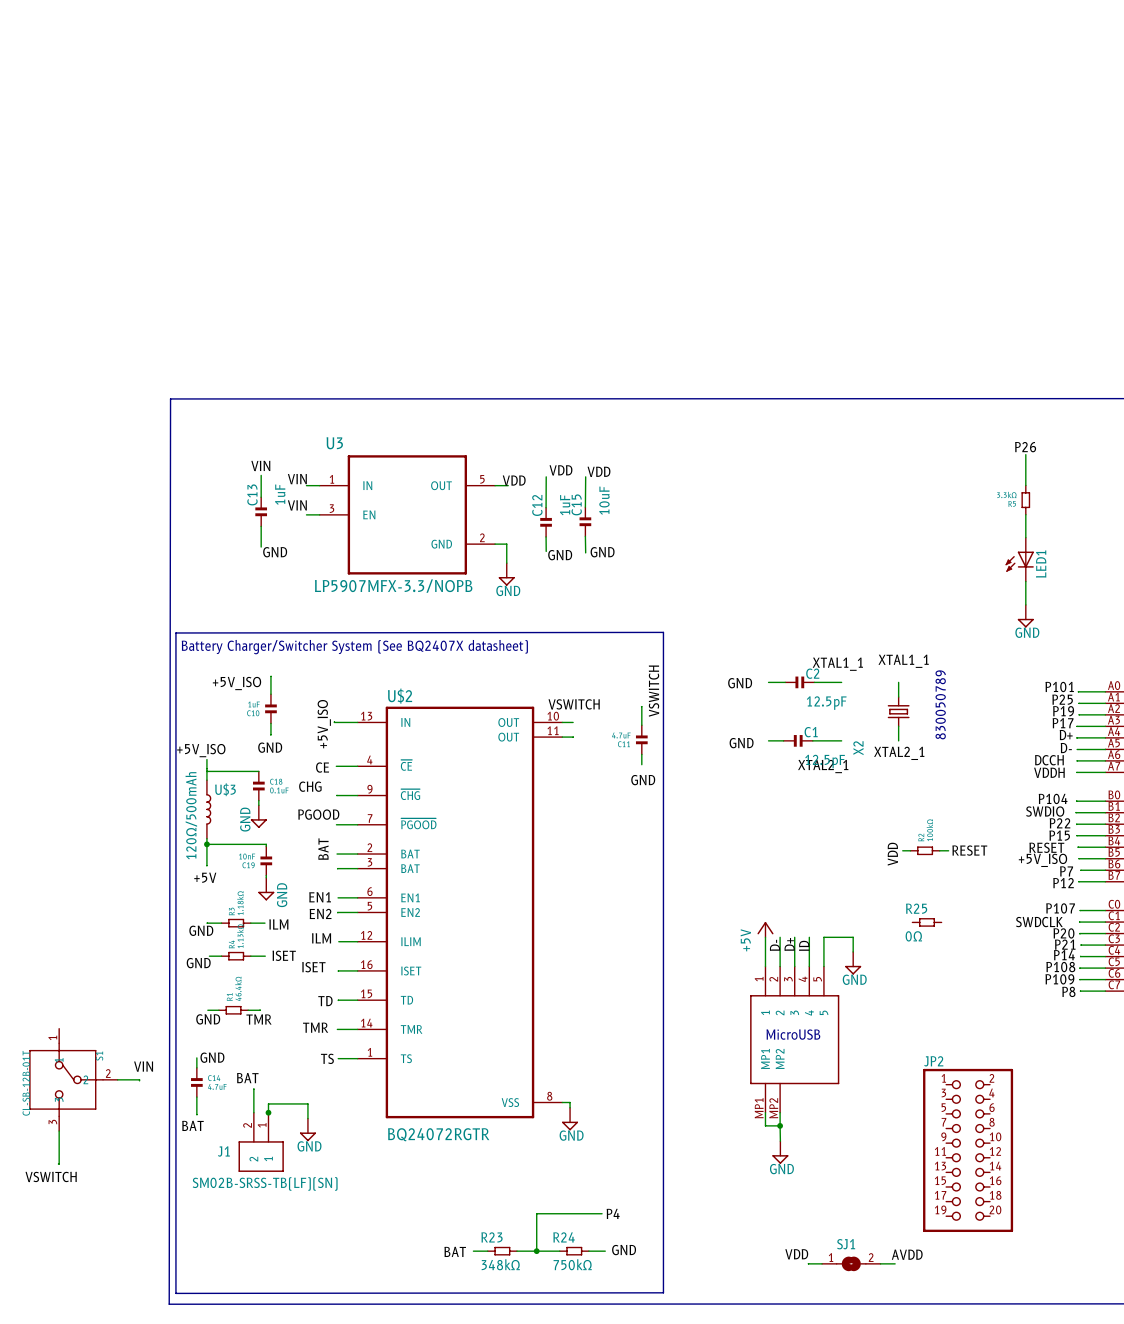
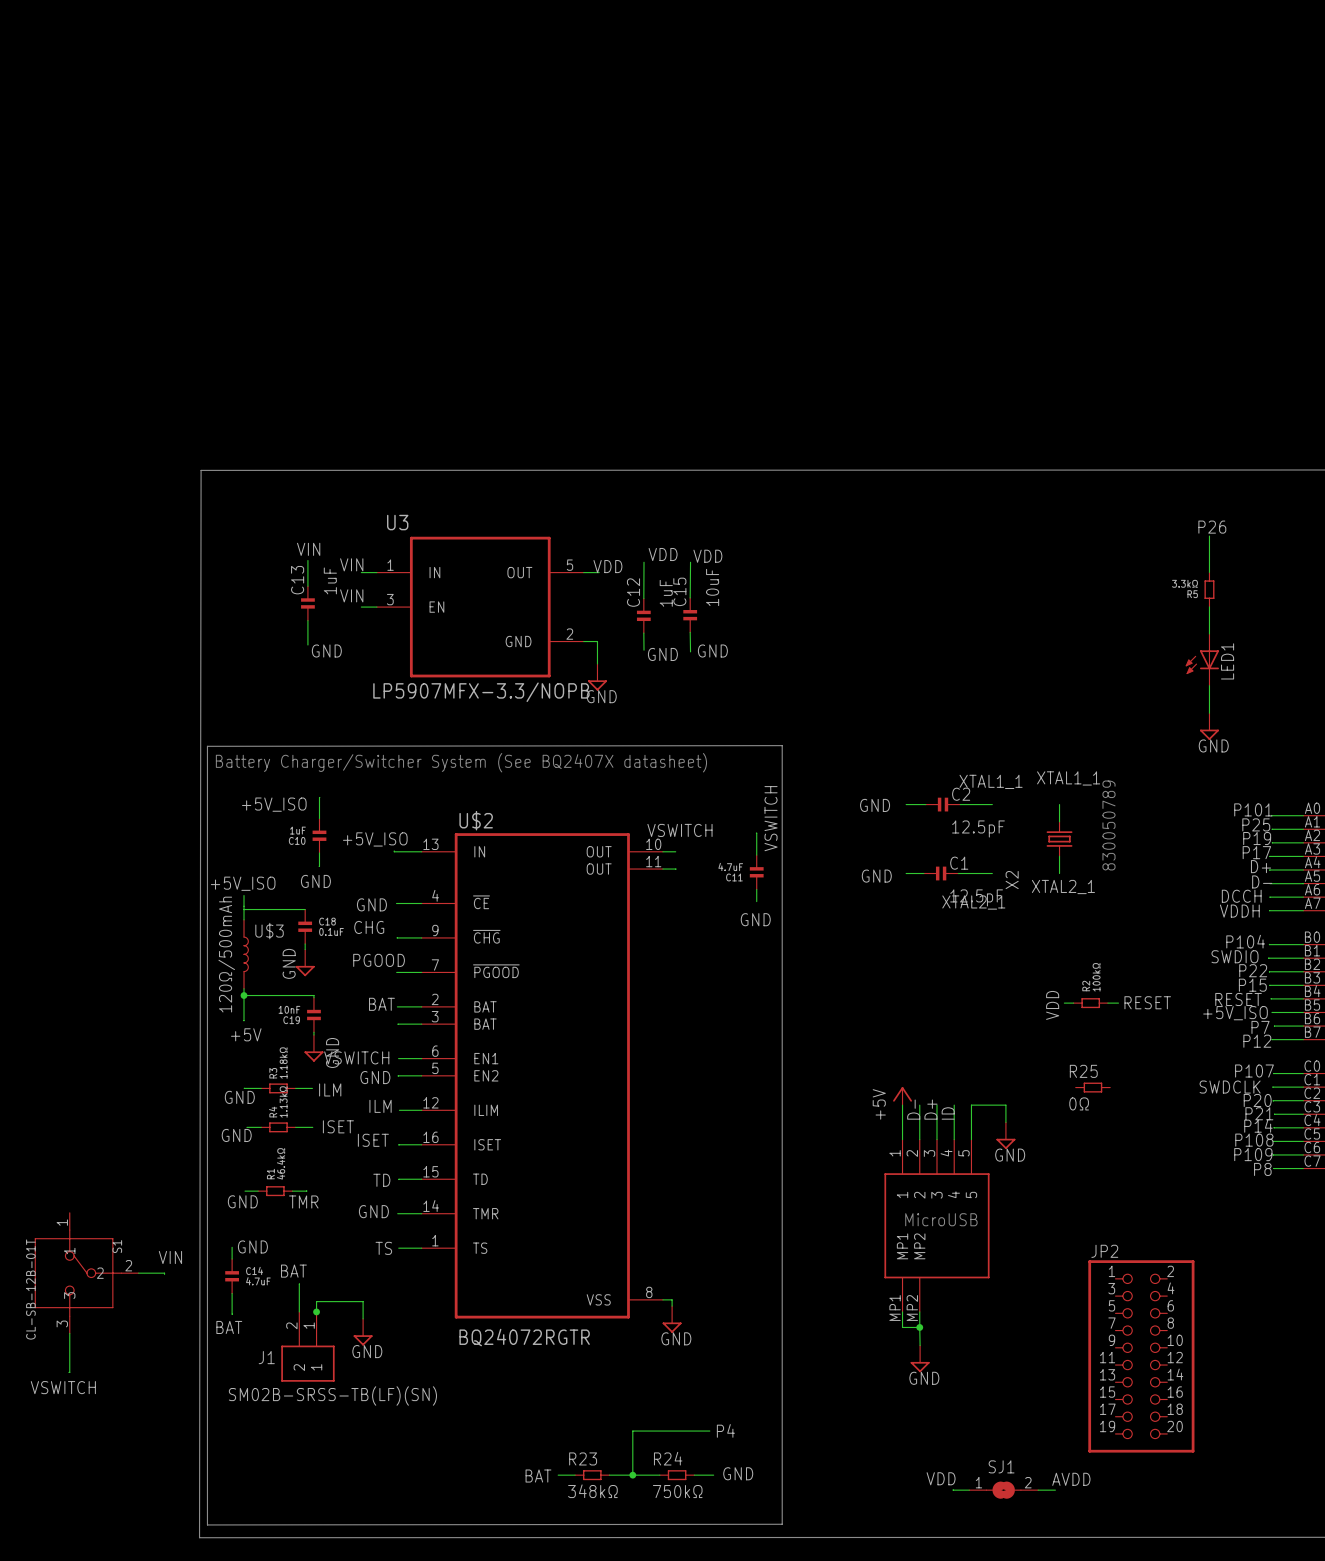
label rotation: 0° (324, 724) -> 90° clockwise (375, 839)
label: CE (322, 767) -> GND (371, 904)
label rotation: 0° (323, 849) -> 90° clockwise (381, 1004)
label: EN1 (320, 897) -> VSWITCH (356, 1057)
label: EN2 (320, 913) -> GND (375, 1077)
label: TMR (315, 1027) -> GND (373, 1211)

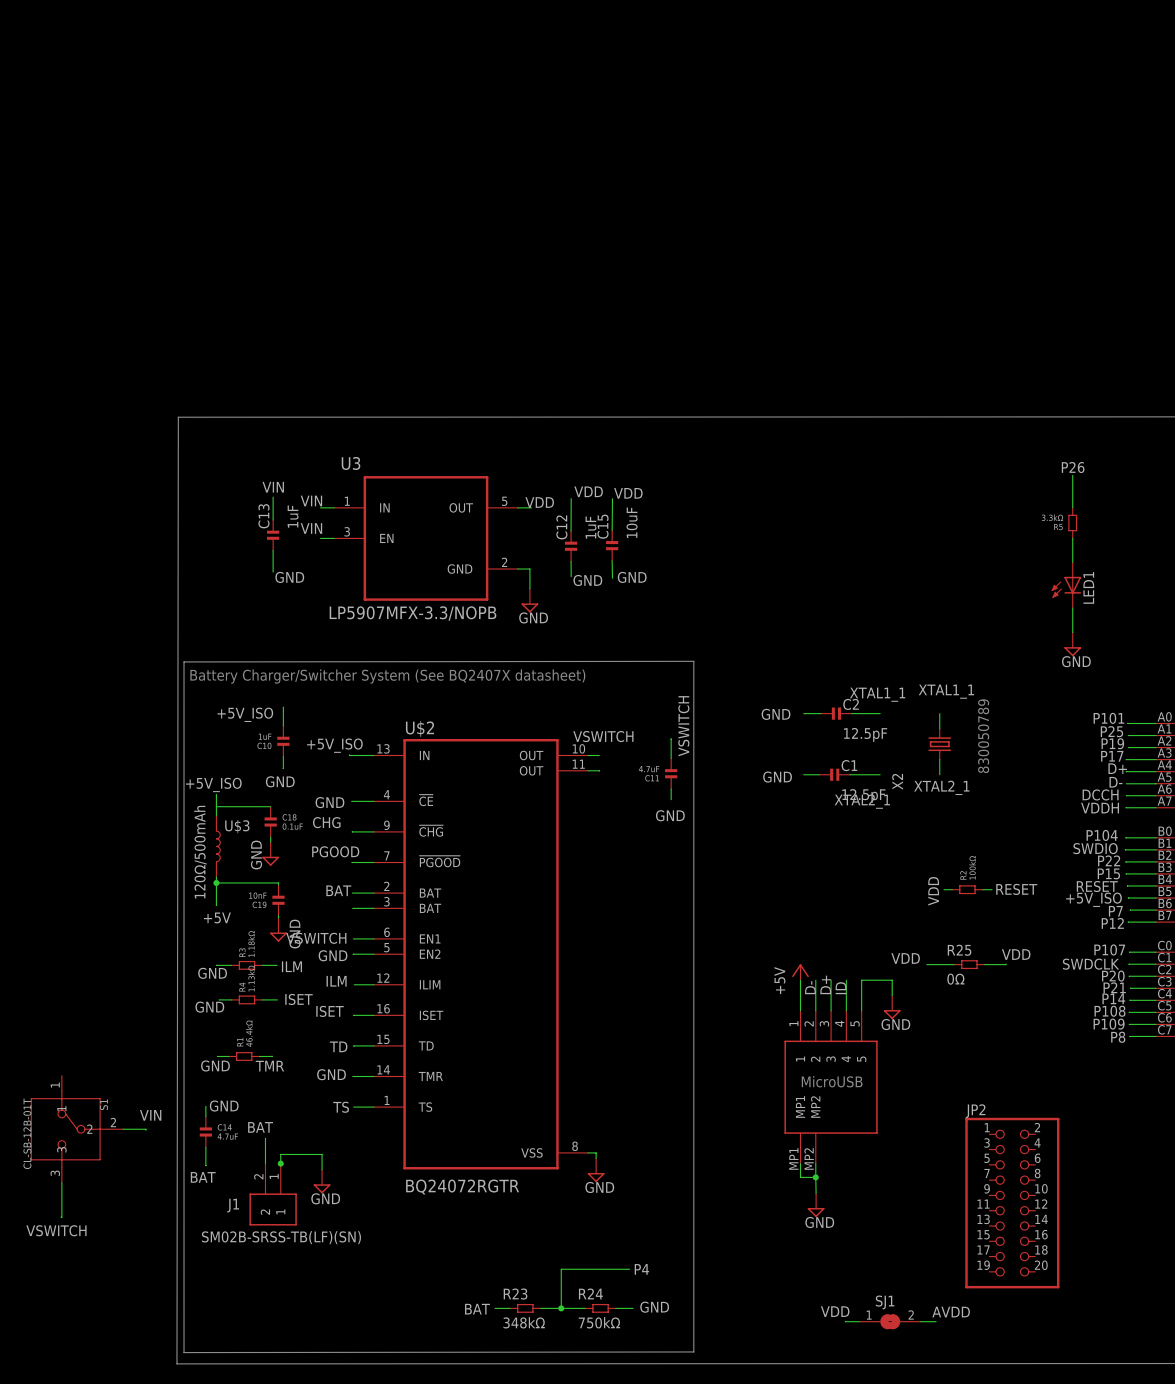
label: none -> VDD (1016, 954)
label: none -> VDD (905, 958)
wire: none -> (926, 964) (954, 964)
wire: none -> (1005, 964) (984, 964)

